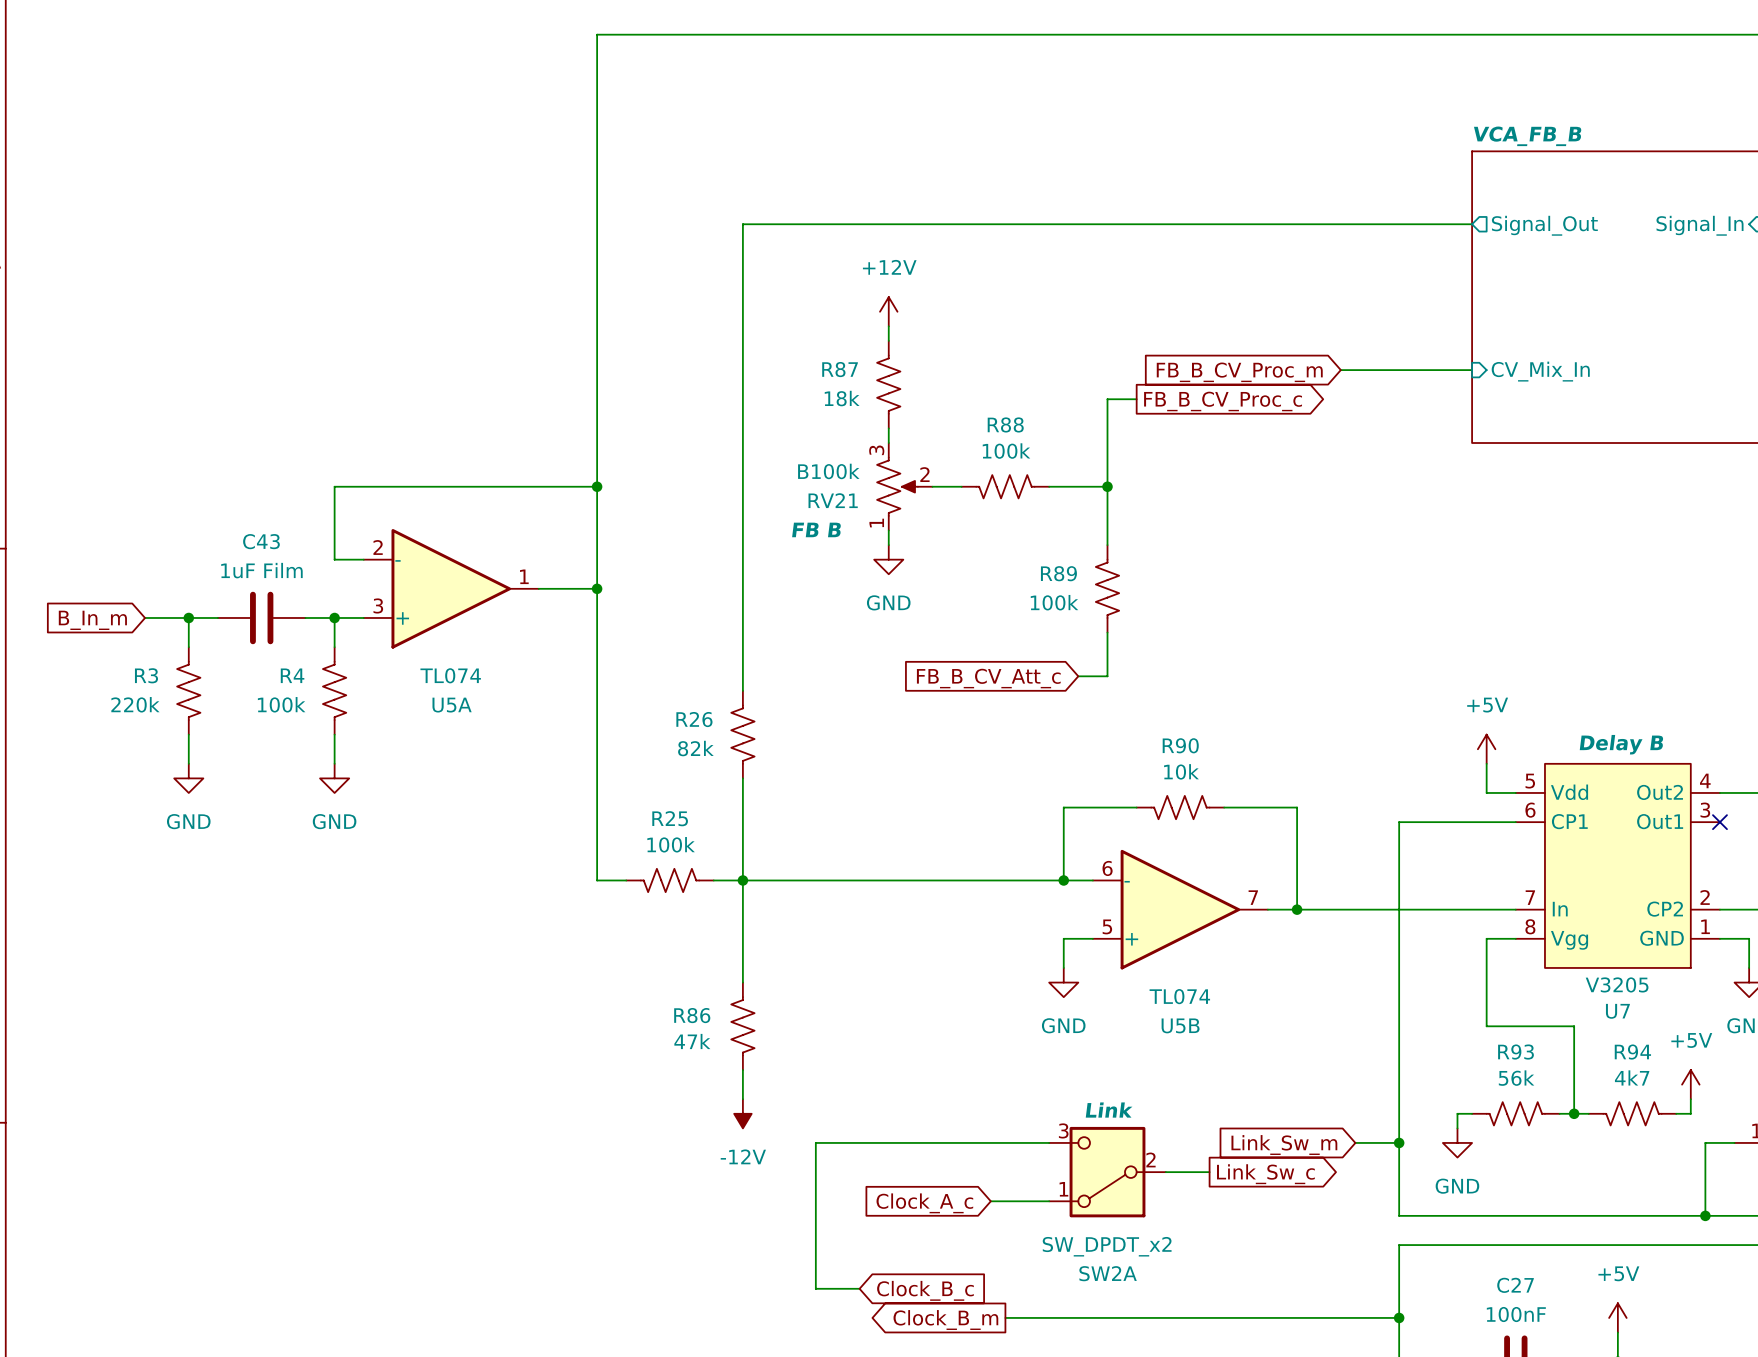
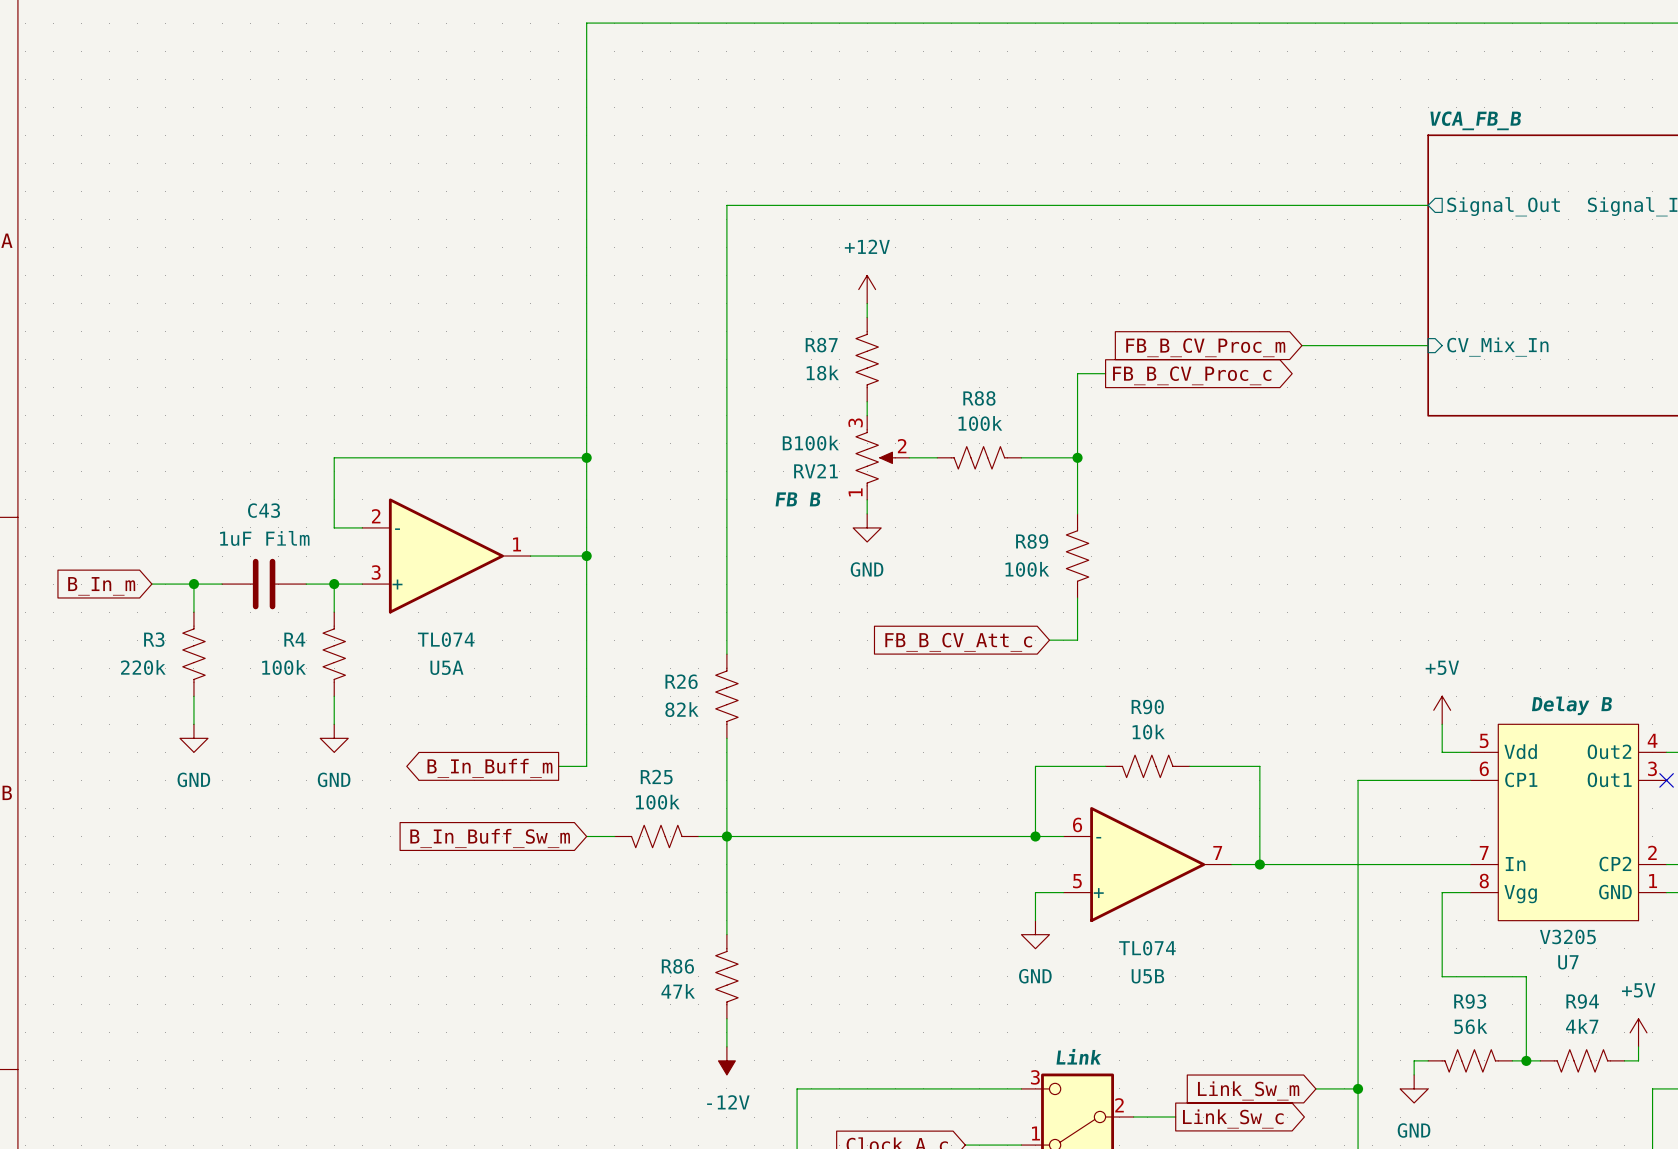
wire: (597, 807) (597, 880) -> (586, 766) (558, 766)
global label: none -> B_In_Buff_m (489, 768)
global label: none -> B_In_Buff_Sw_m (490, 838)

